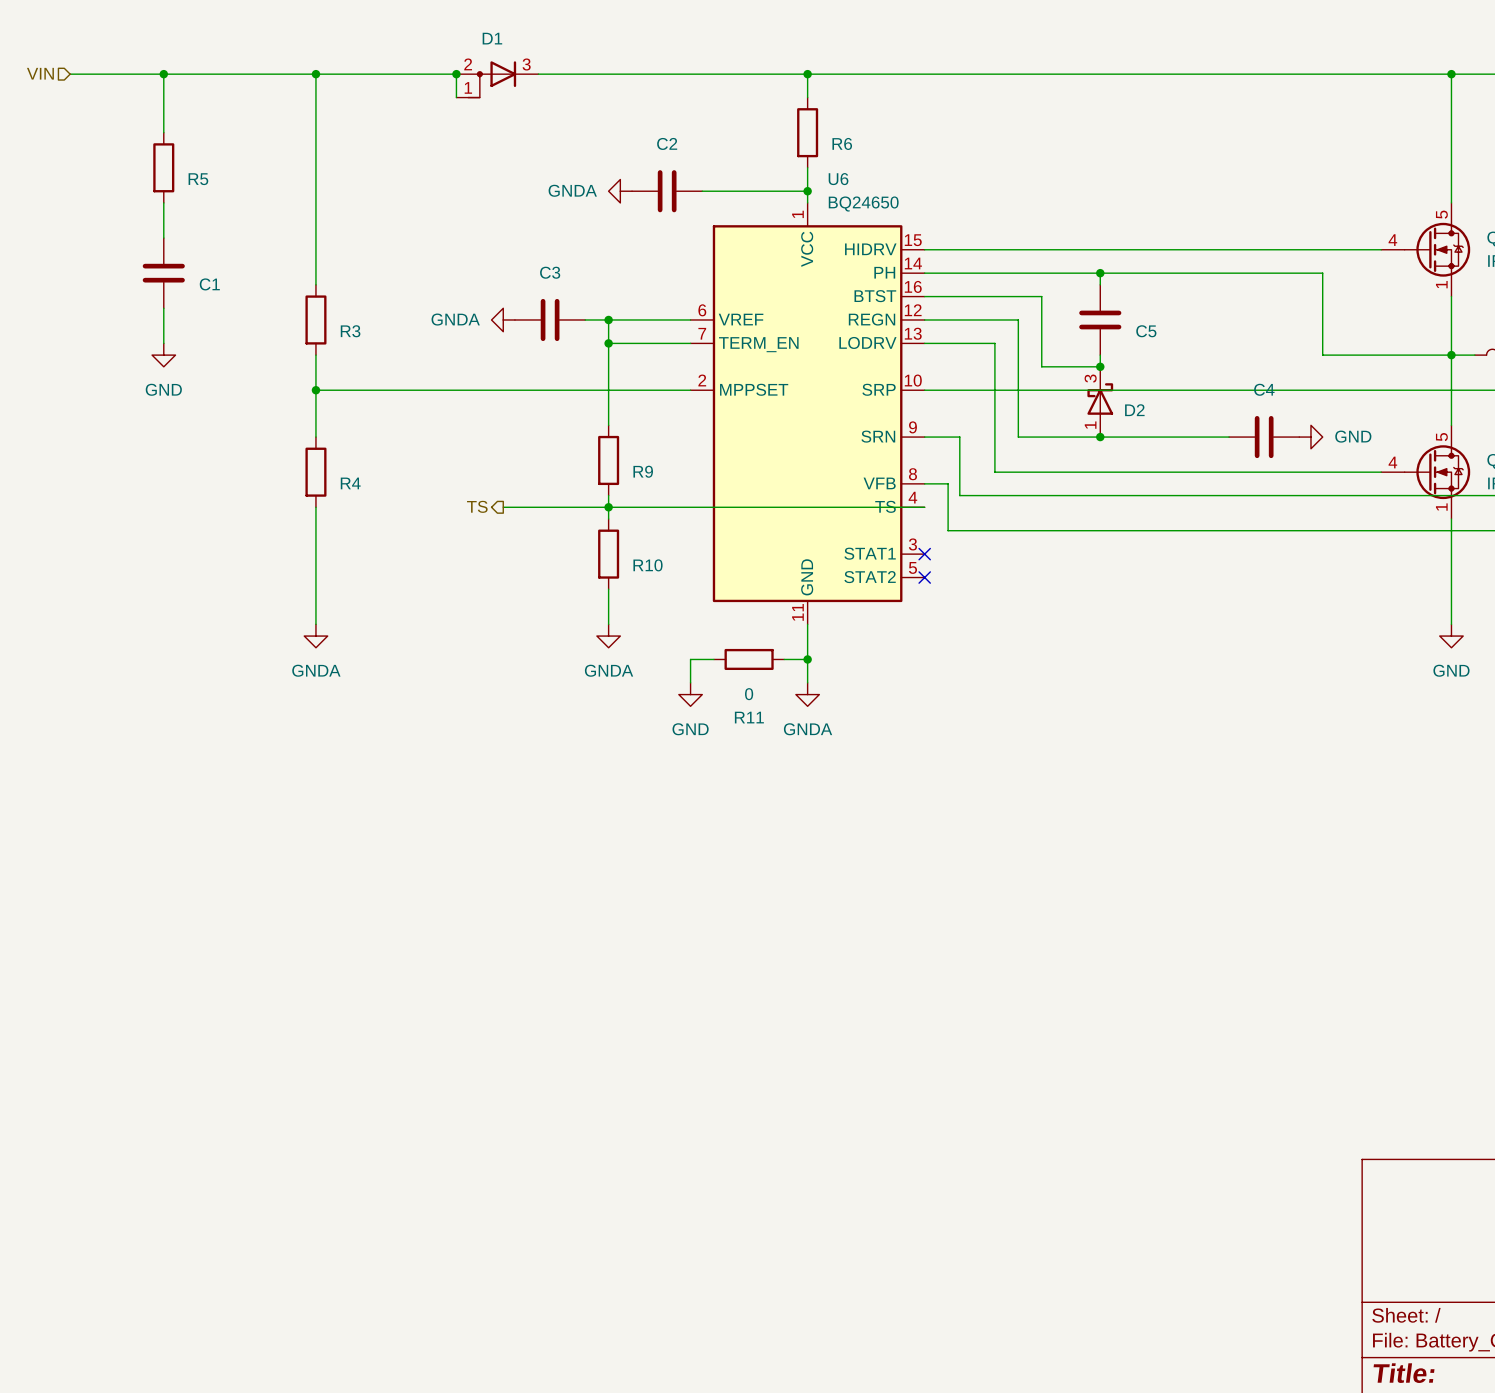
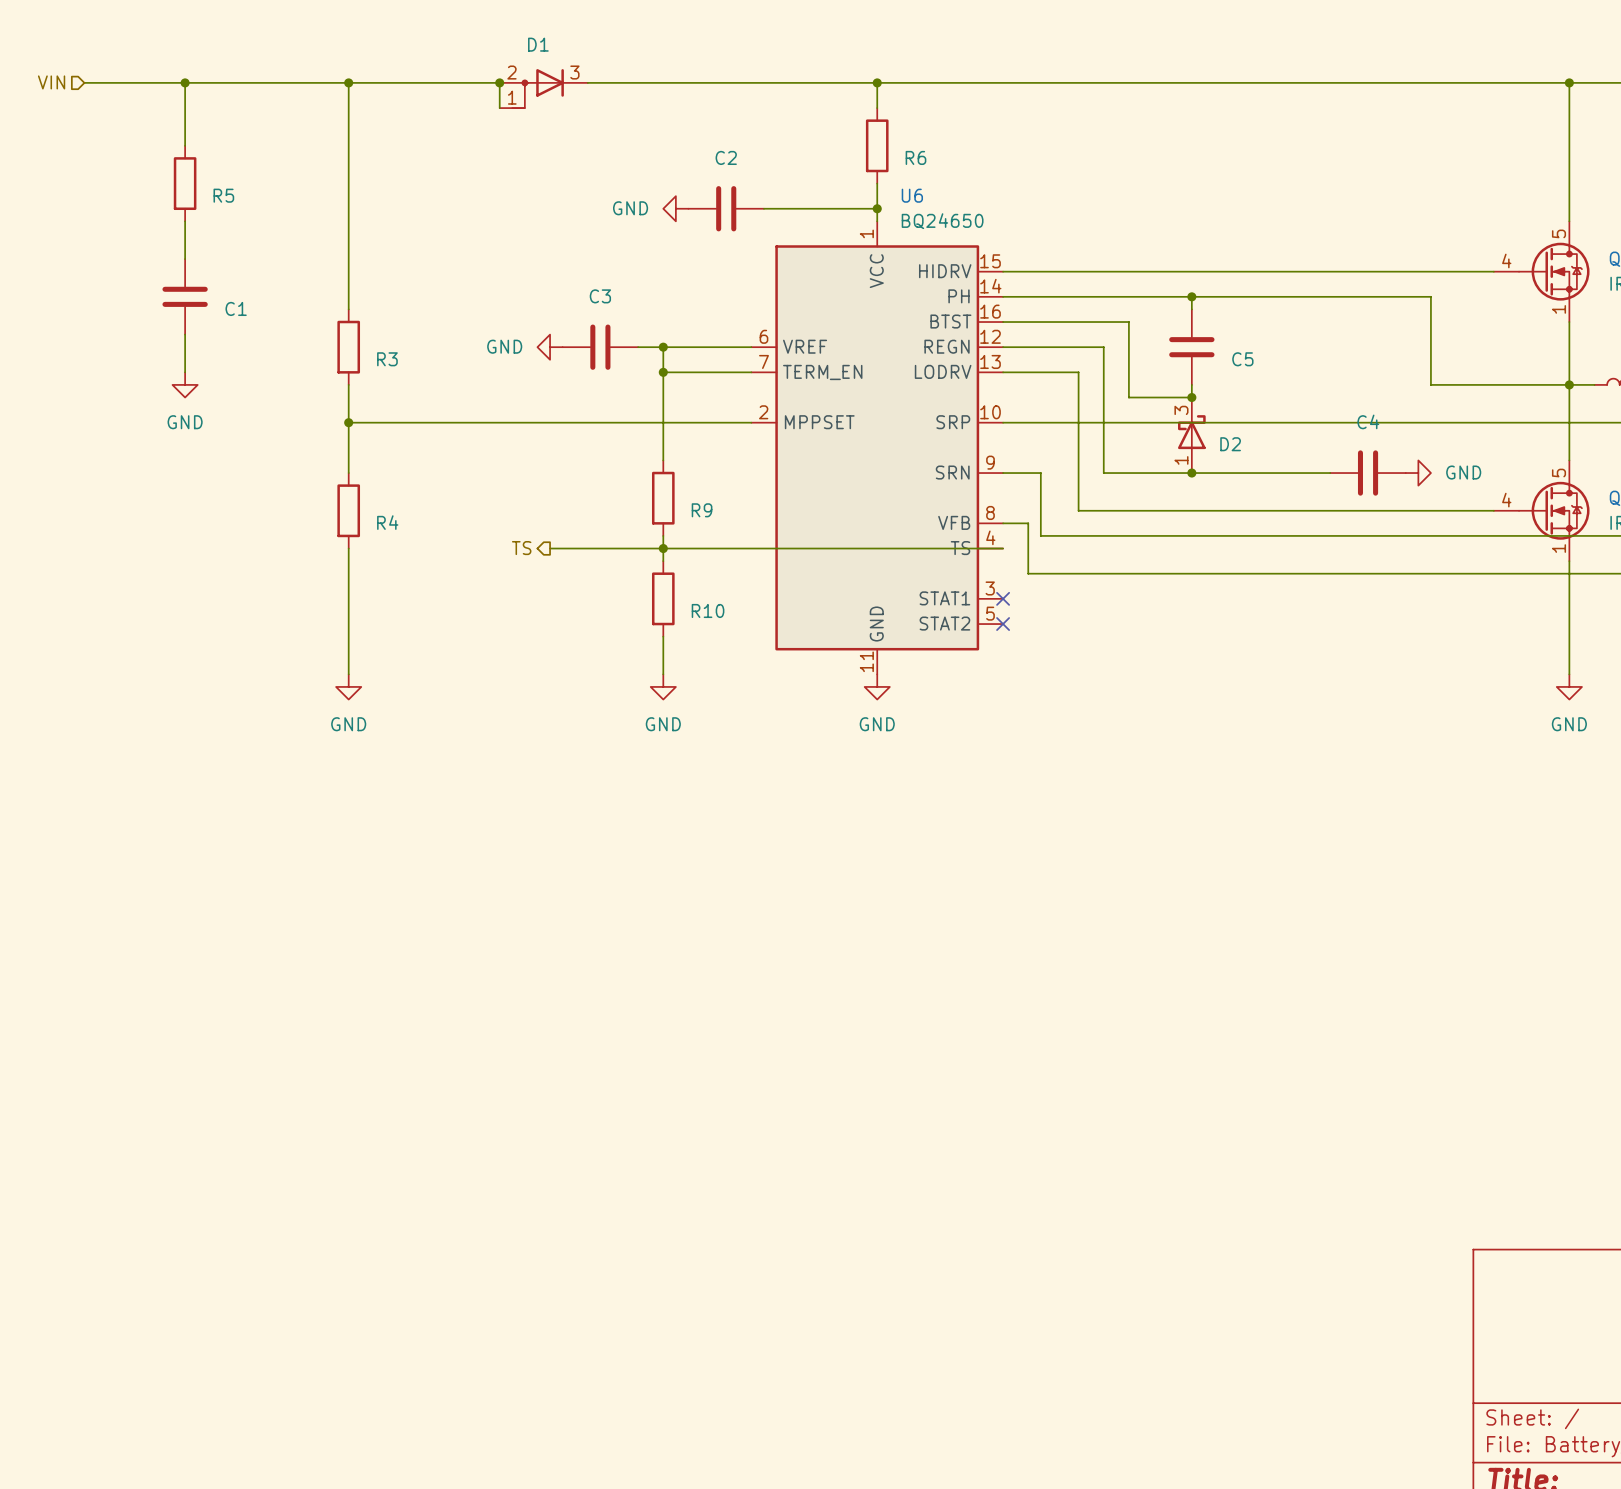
power symbol: GNDA (620, 191) -> GND (675, 208)
power symbol: GNDA (503, 319) -> GND (550, 347)
wire: (807, 624) (807, 682) -> none
power symbol: GNDA (315, 636) -> GND (348, 686)
power symbol: GNDA (608, 636) -> GND (663, 686)
wire: (713, 659) (690, 659) (690, 682) -> none
R11: 0 (749, 659) -> none
wire: (784, 659) (807, 659) -> none
junction: (807, 659) -> none
power symbol position: GND (690, 694) -> GND (877, 686)
power symbol: GNDA (807, 694) -> none

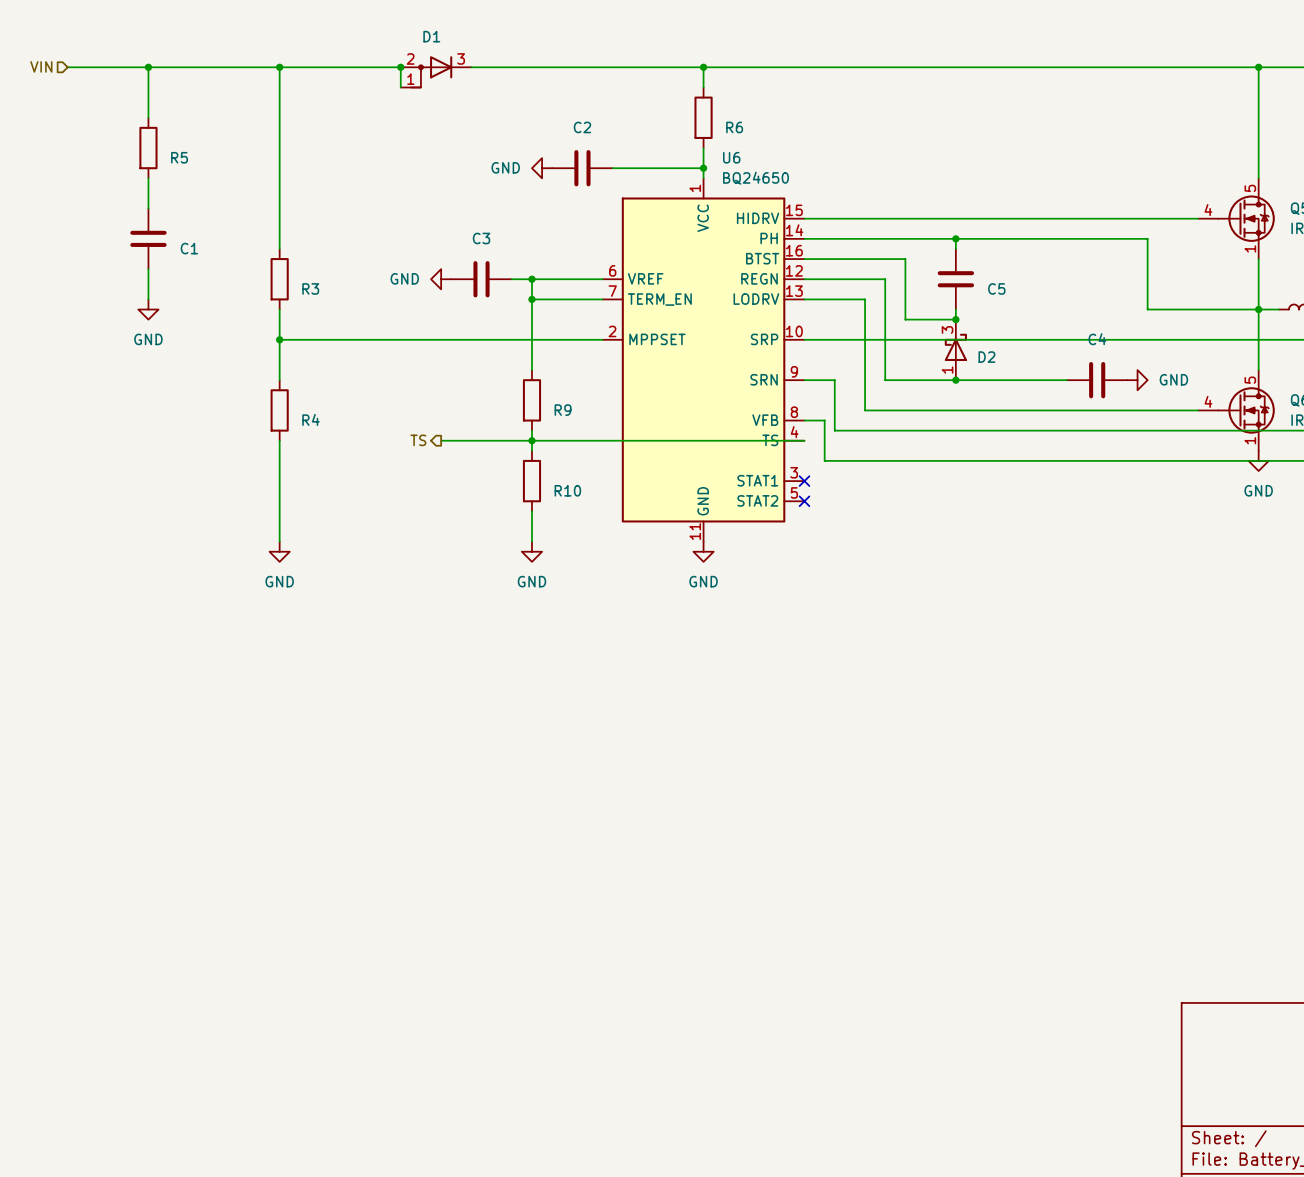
wire: (1569, 561) (1569, 674) -> none
power symbol position: GND (1569, 686) -> GND (1258, 460)

